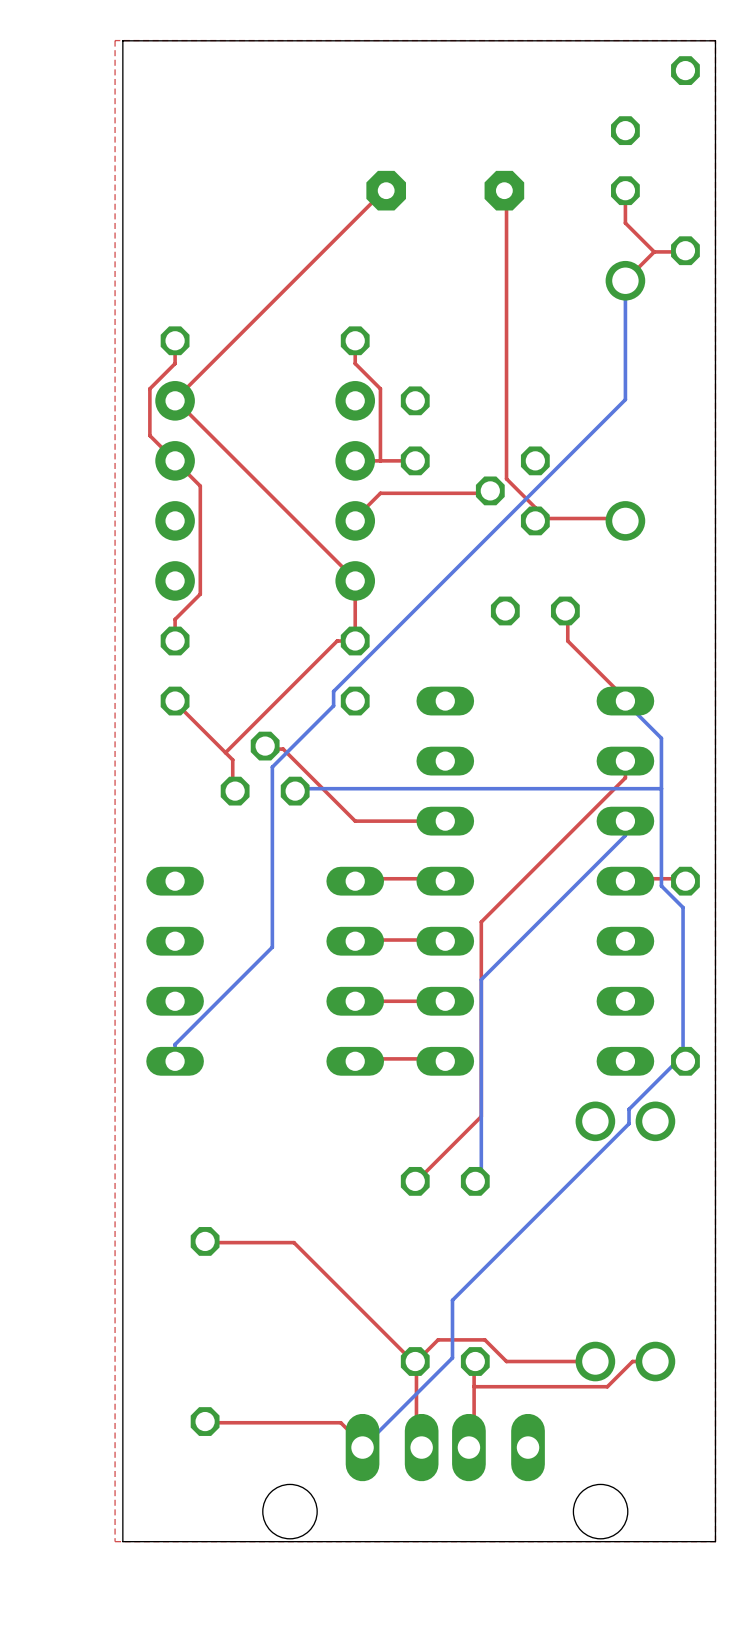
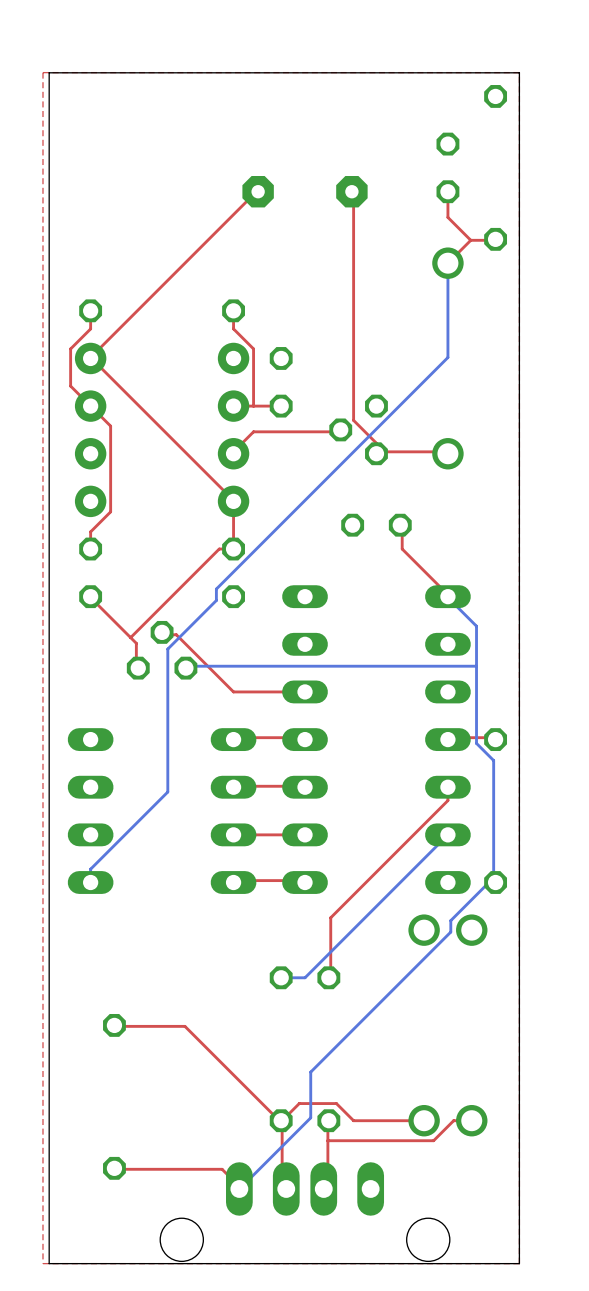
top track: (625, 761) (625, 777) (481, 922) (481, 1116) (415, 1181) -> none
bottom track: (625, 821) (625, 835) (481, 979) (481, 1177) (475, 1181) -> none
top track: none -> (447, 787) (447, 800) (330, 917) (330, 977) (328, 977)
bottom track: none -> (447, 834) (305, 977) (281, 977)

